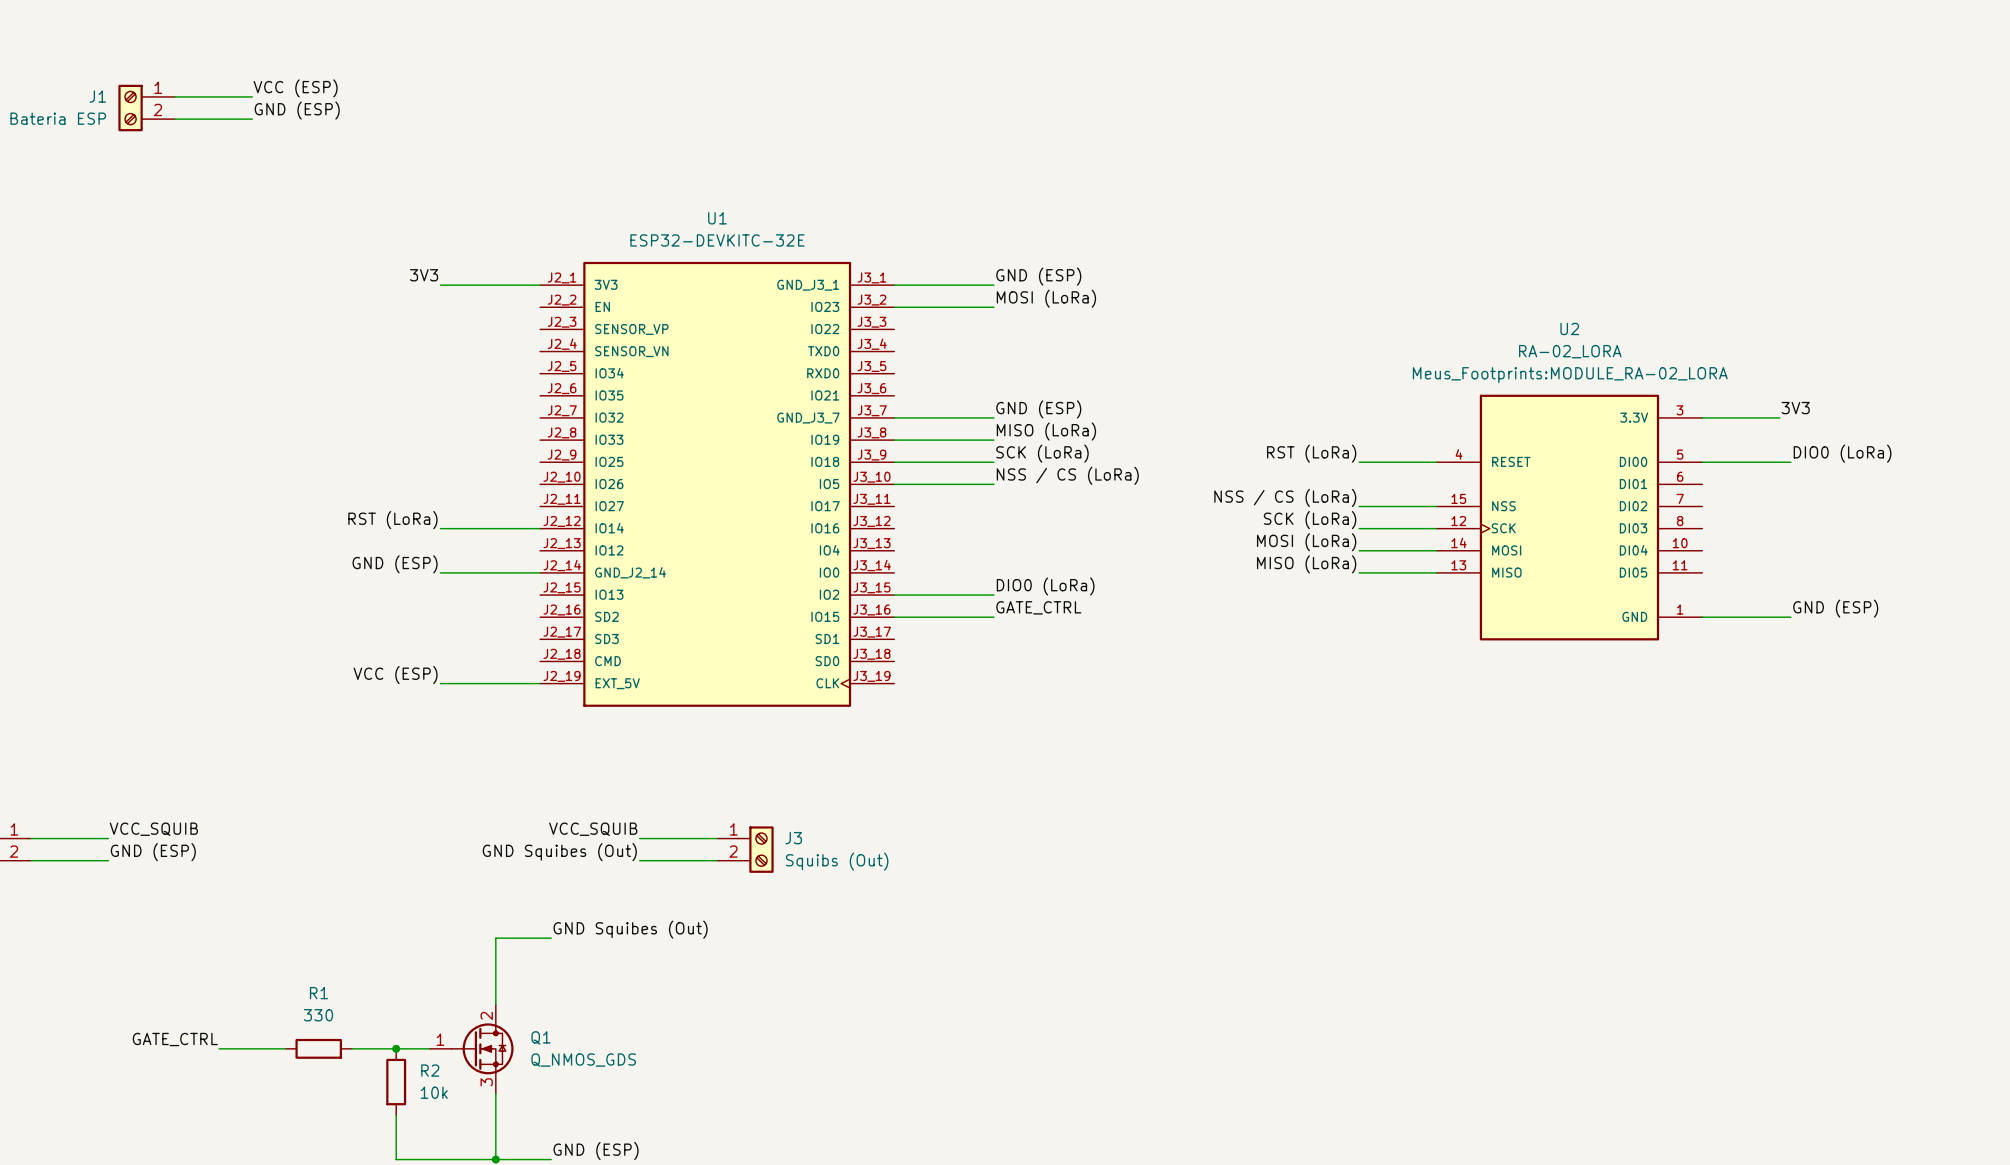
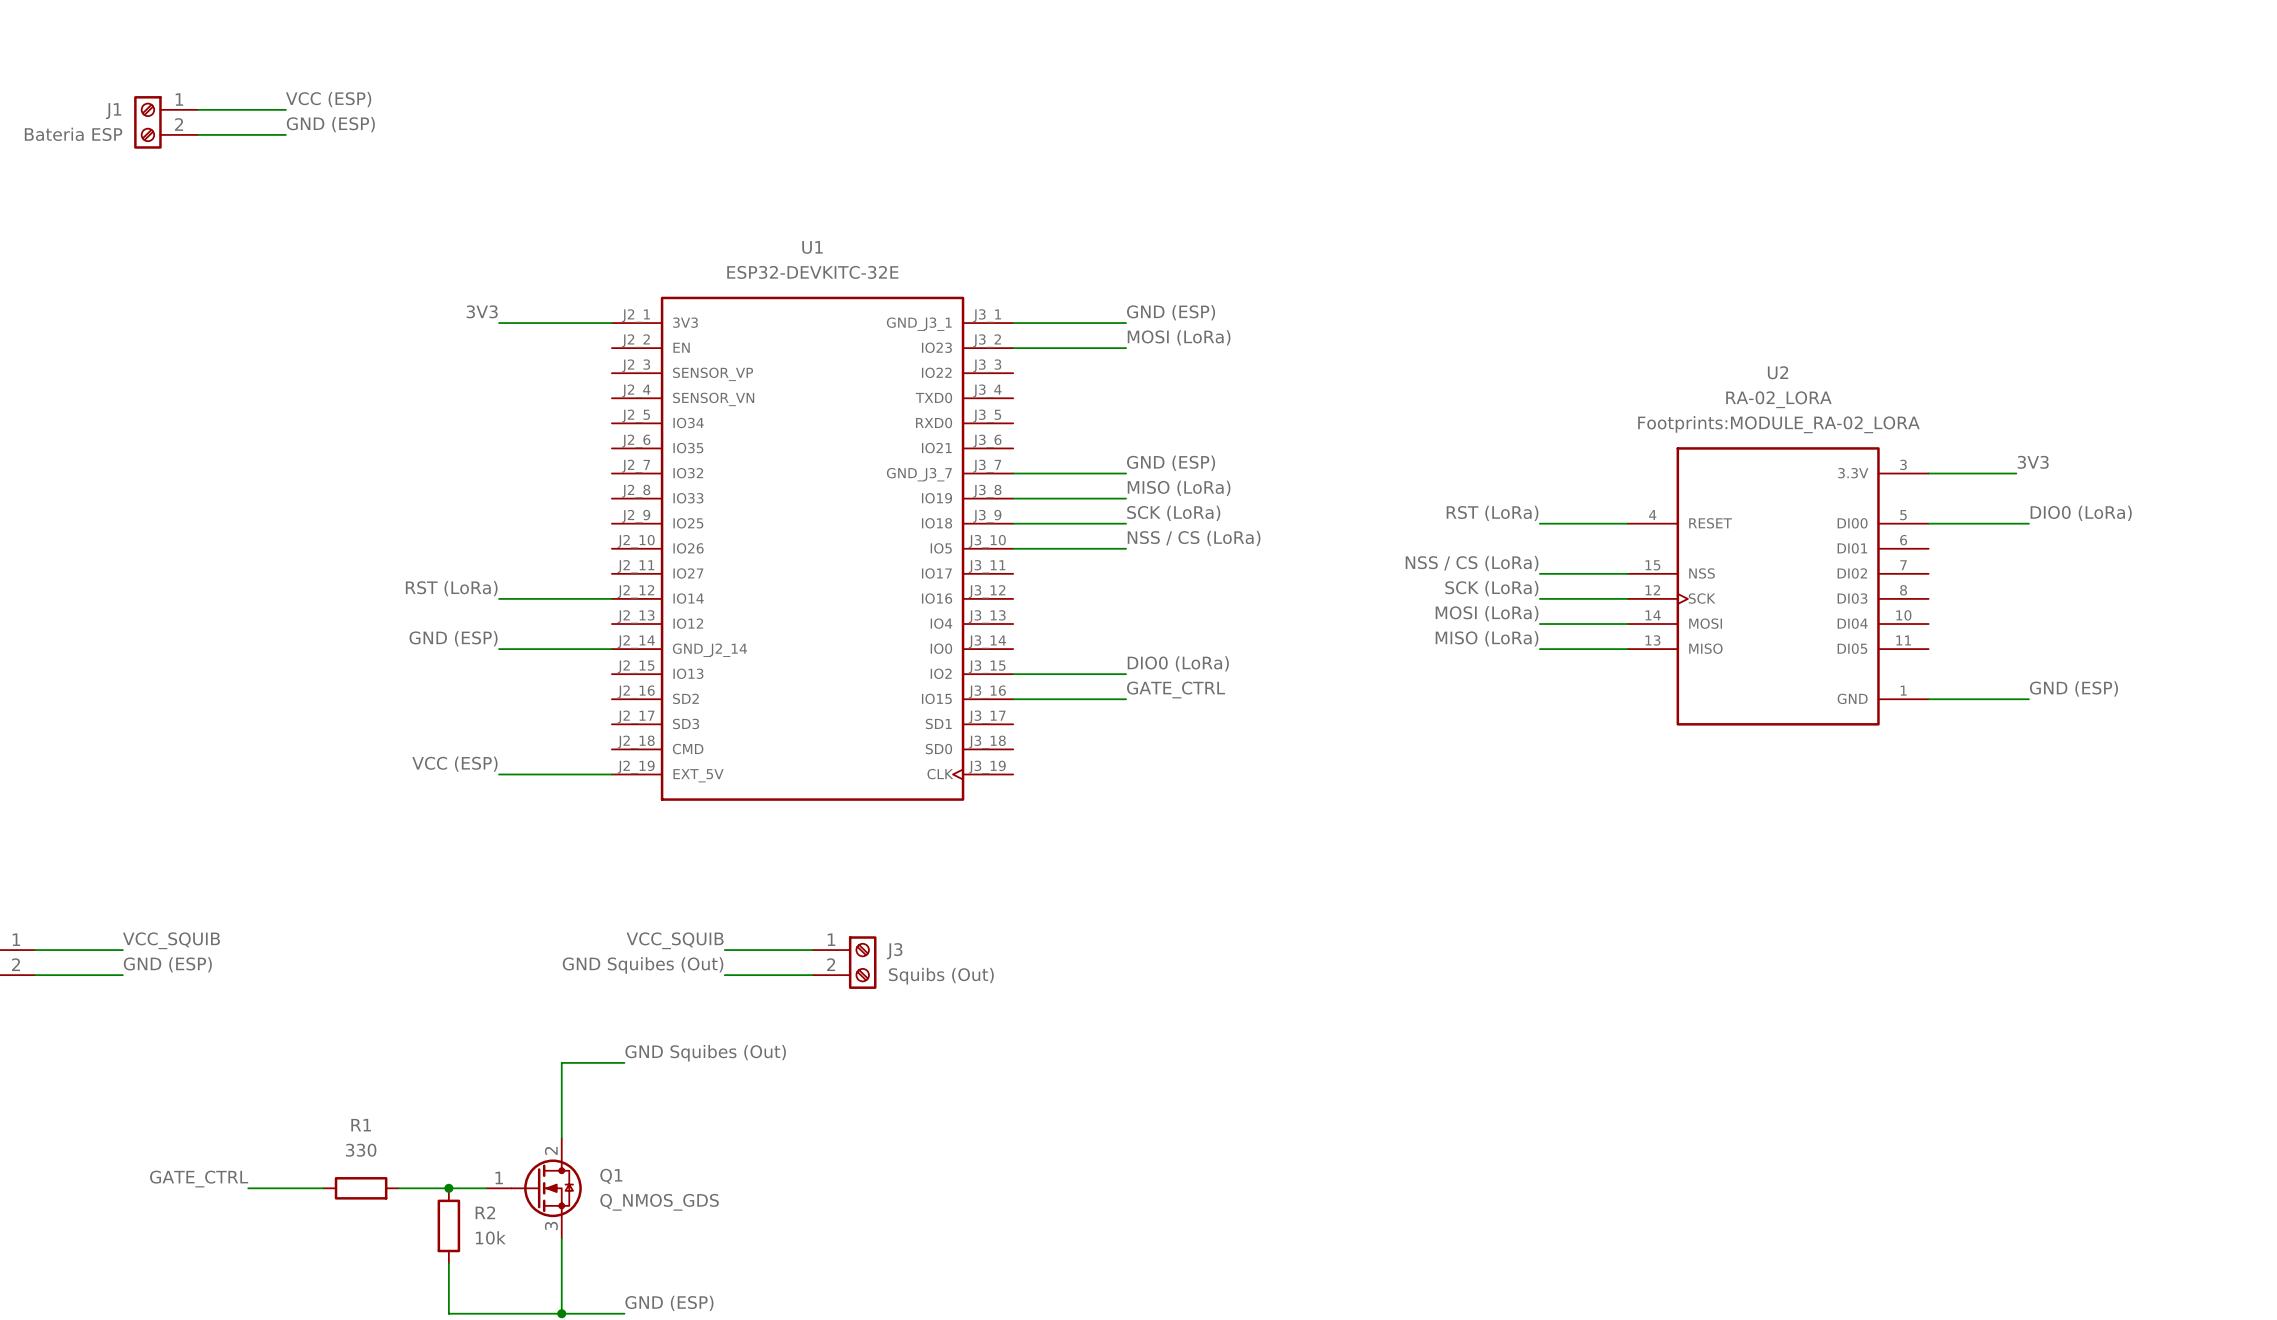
U2 text: Meus_Footprints:MODULE_RA-02_LORA (1570, 375) -> Footprints:MODULE_RA-02_LORA (1778, 424)

